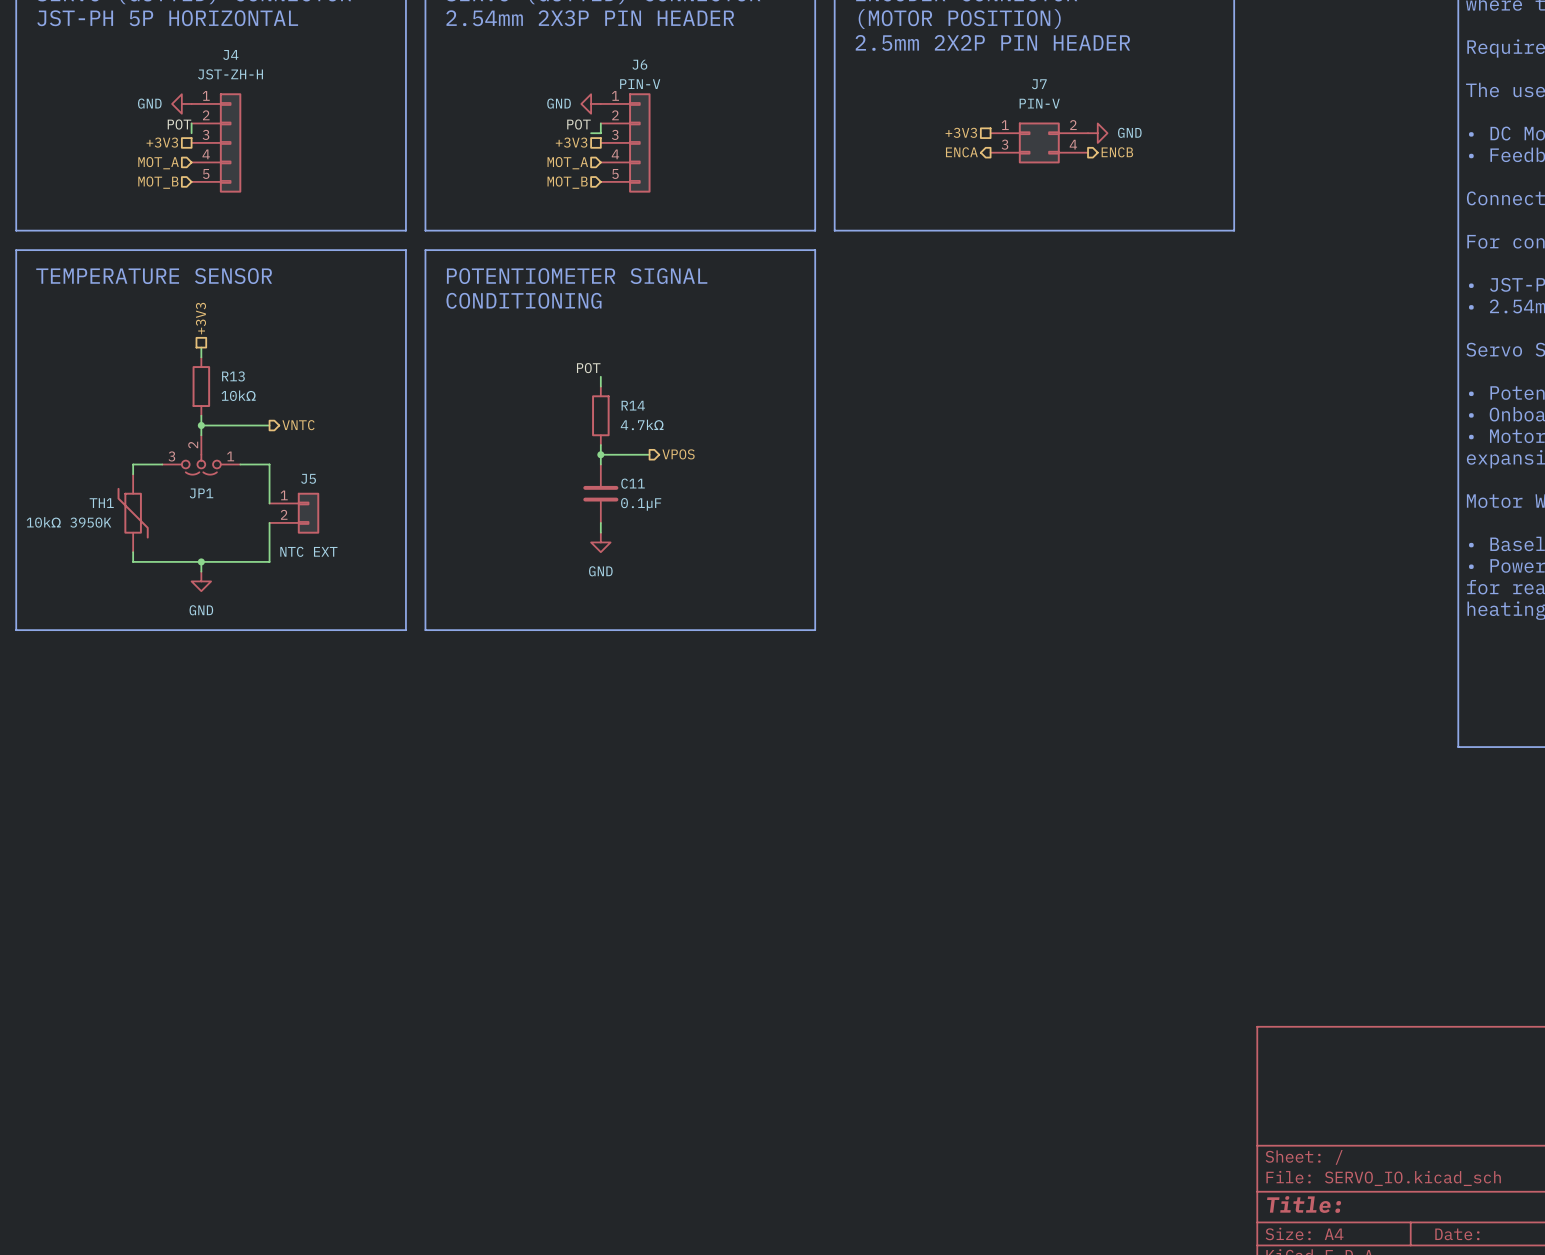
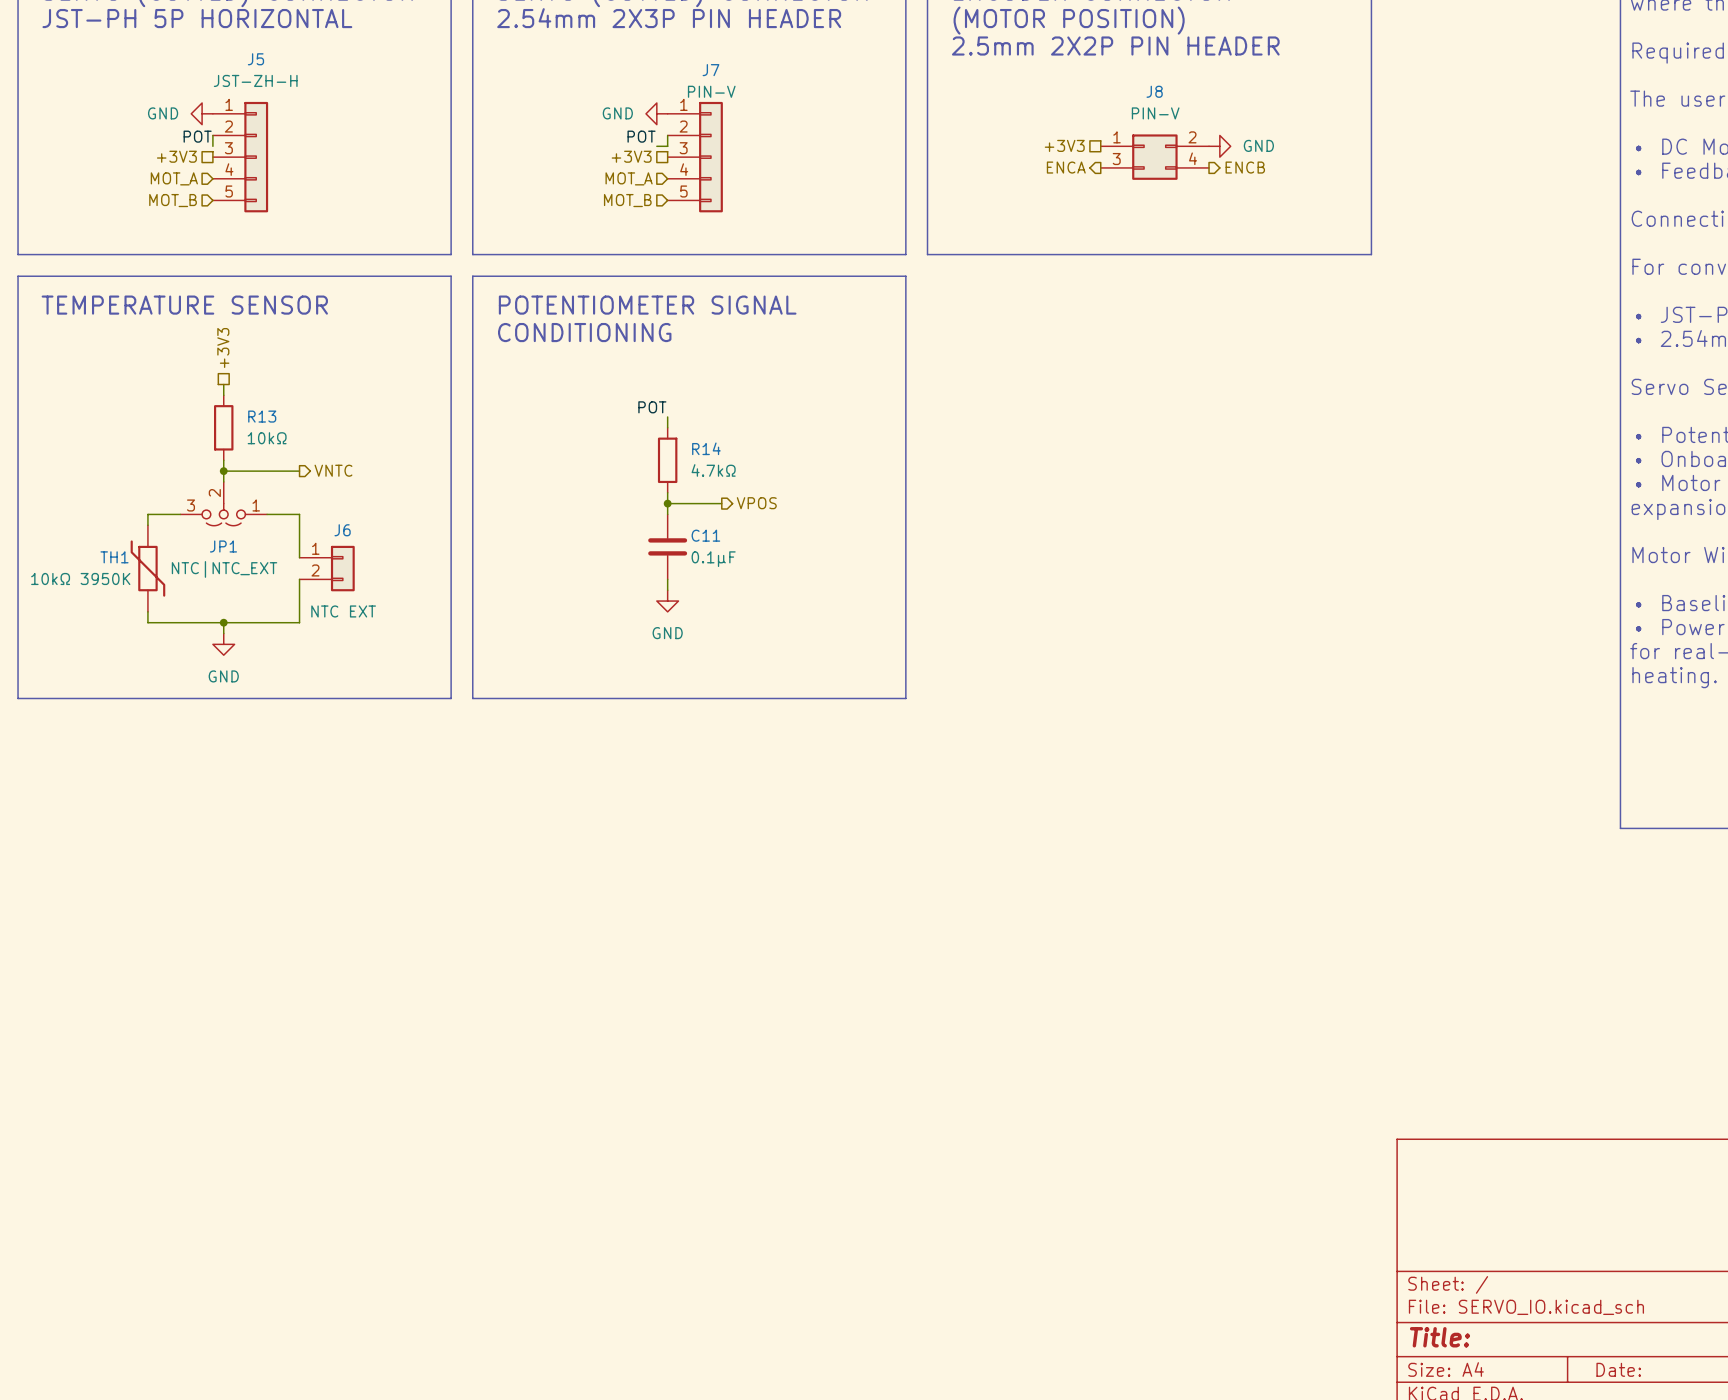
J4 name: J4 (230, 54) -> J5 (255, 59)
J6 name: J6 (639, 64) -> J7 (710, 70)
J7 name: J7 (1039, 84) -> J8 (1154, 91)
J5 name: J5 (308, 478) -> J6 (342, 530)
JP1 value: none -> NTC|NTC_EXT (224, 569)

